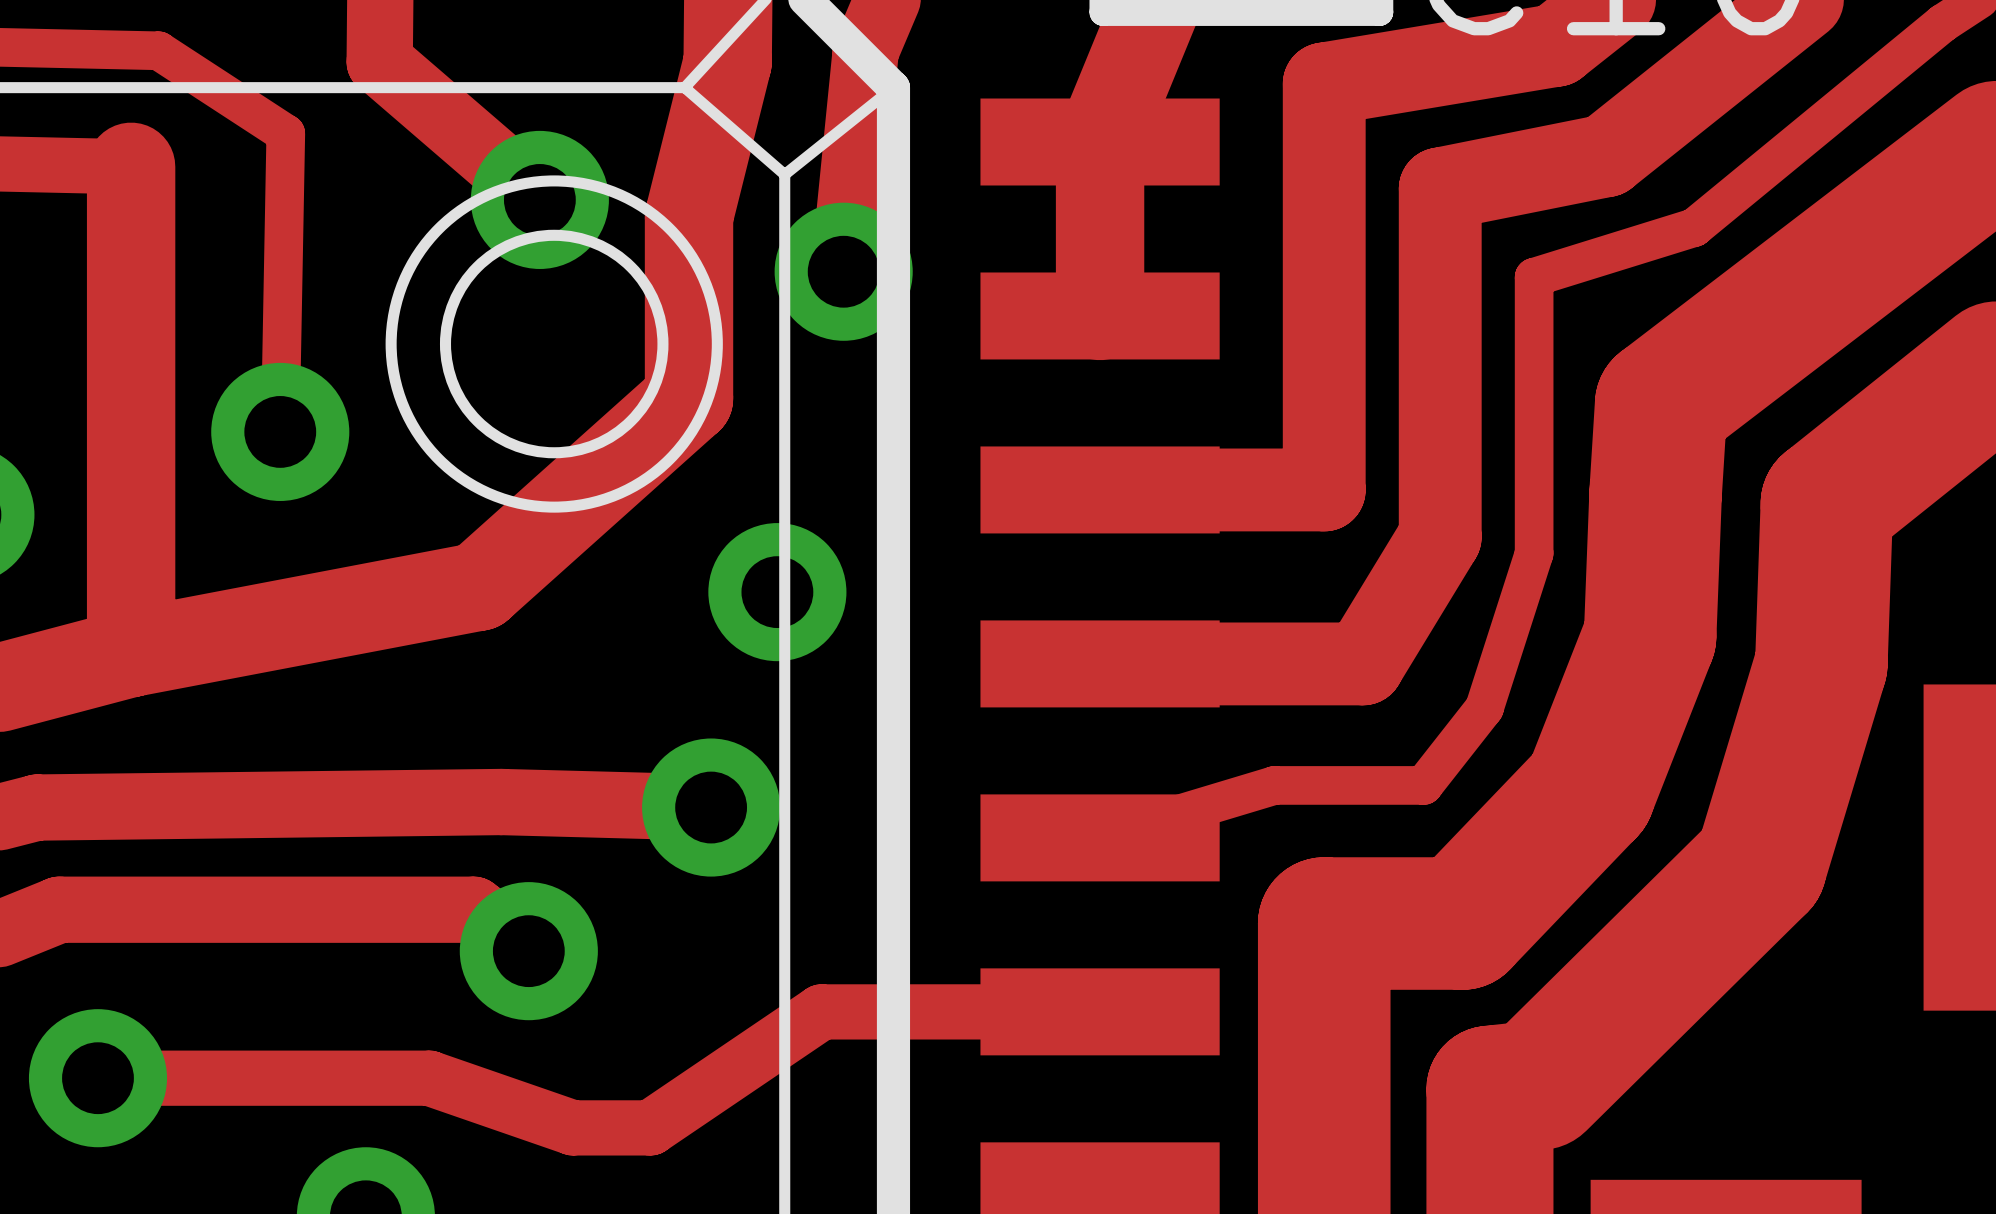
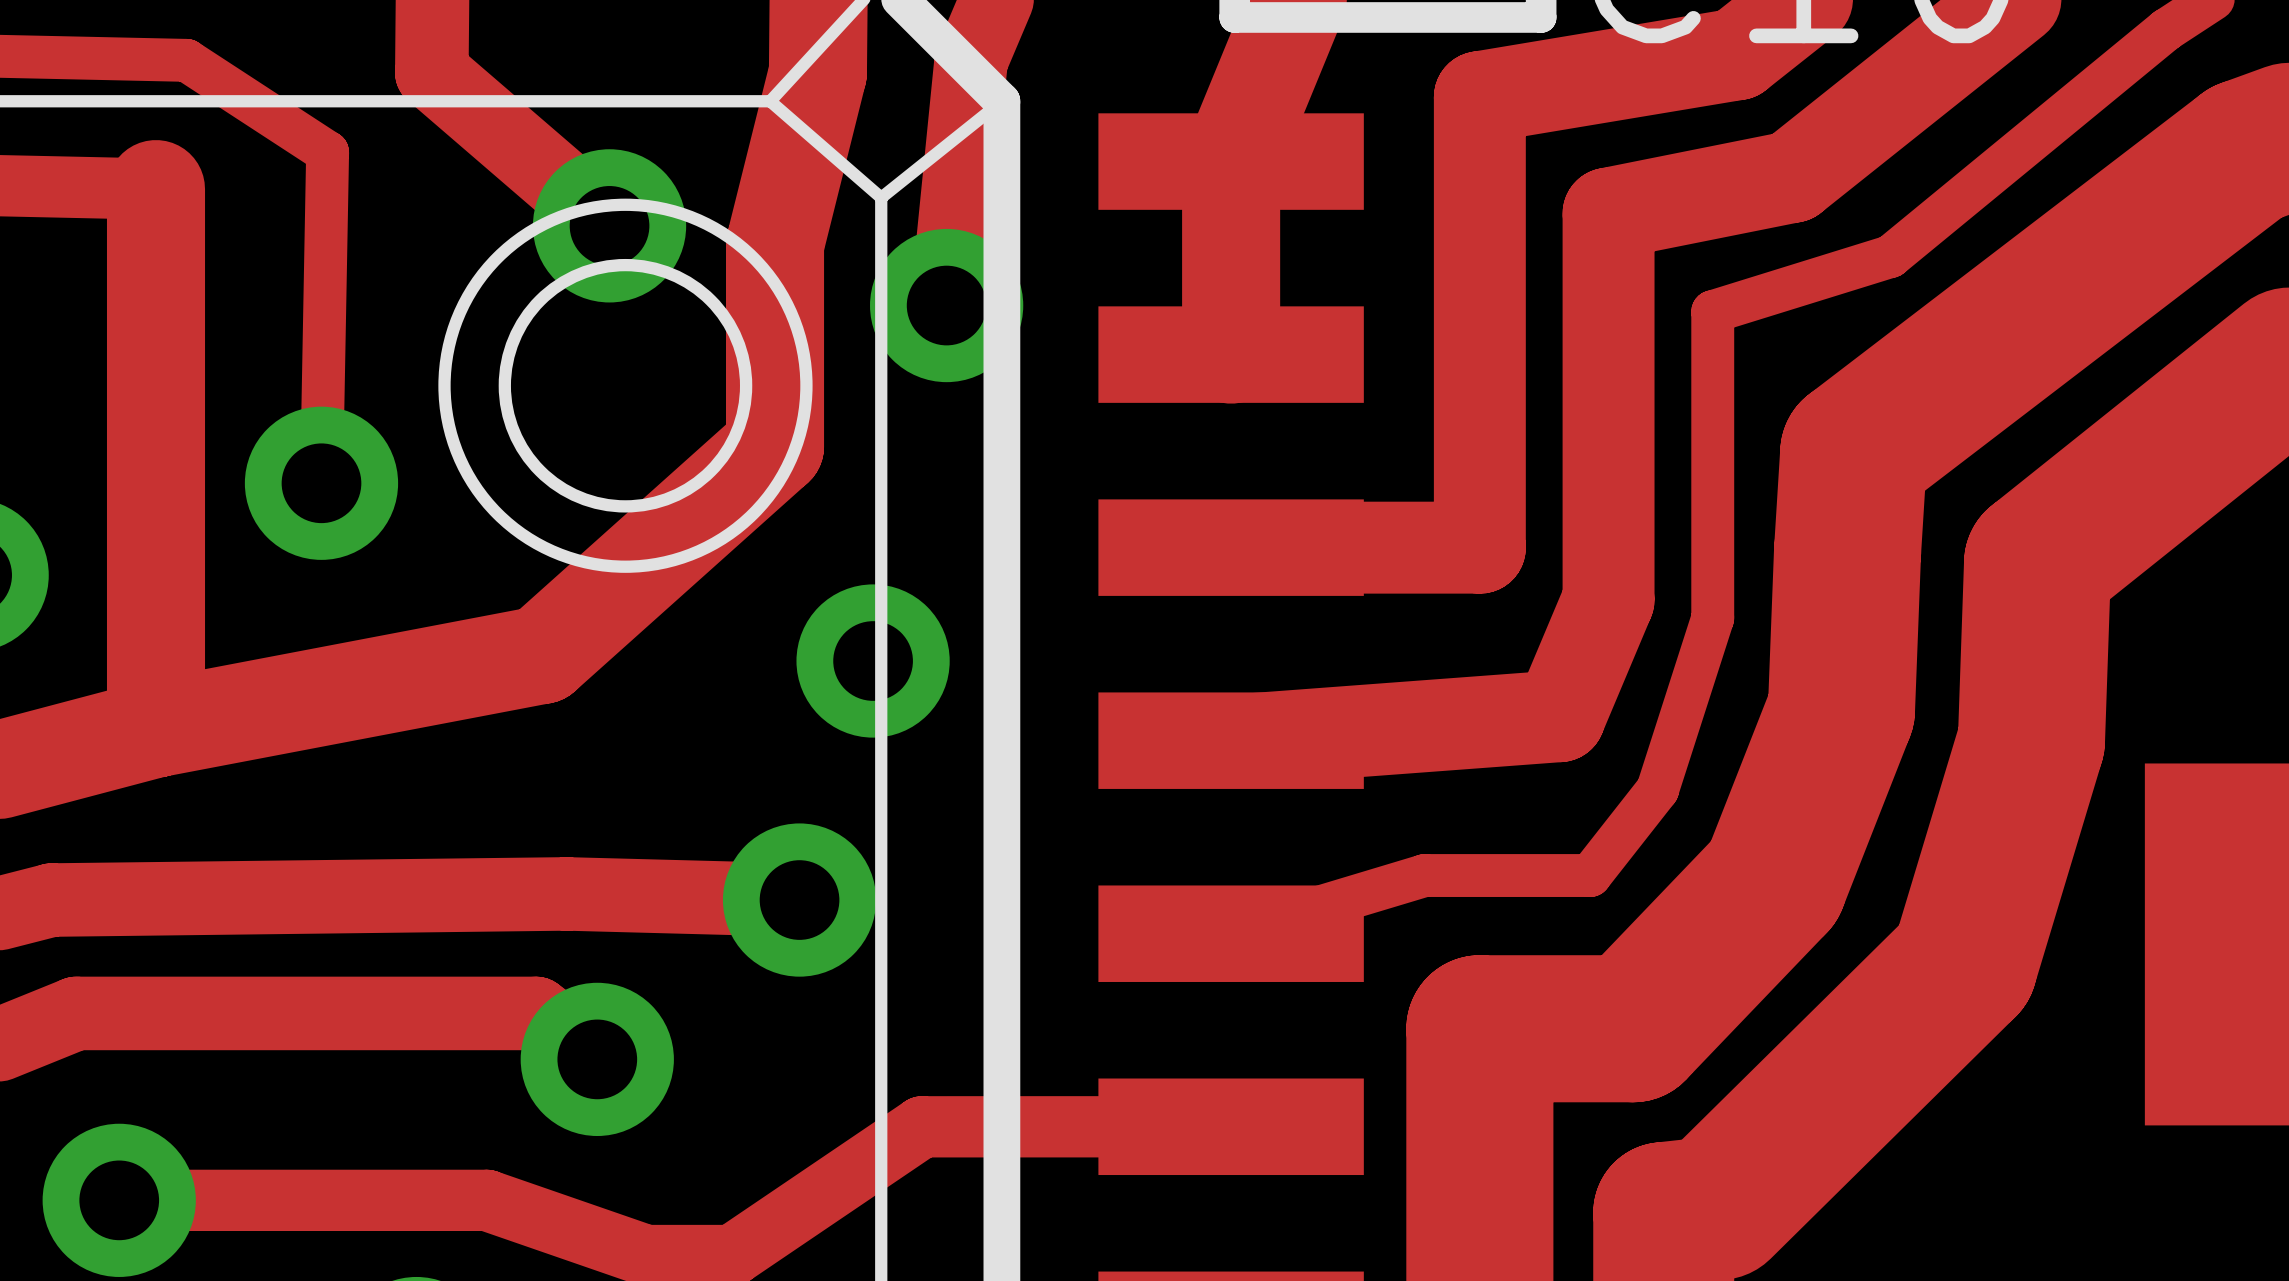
track: (1440, 536) (1362, 663) (1100, 663) -> (1608, 599) (1559, 716) (1231, 740)

